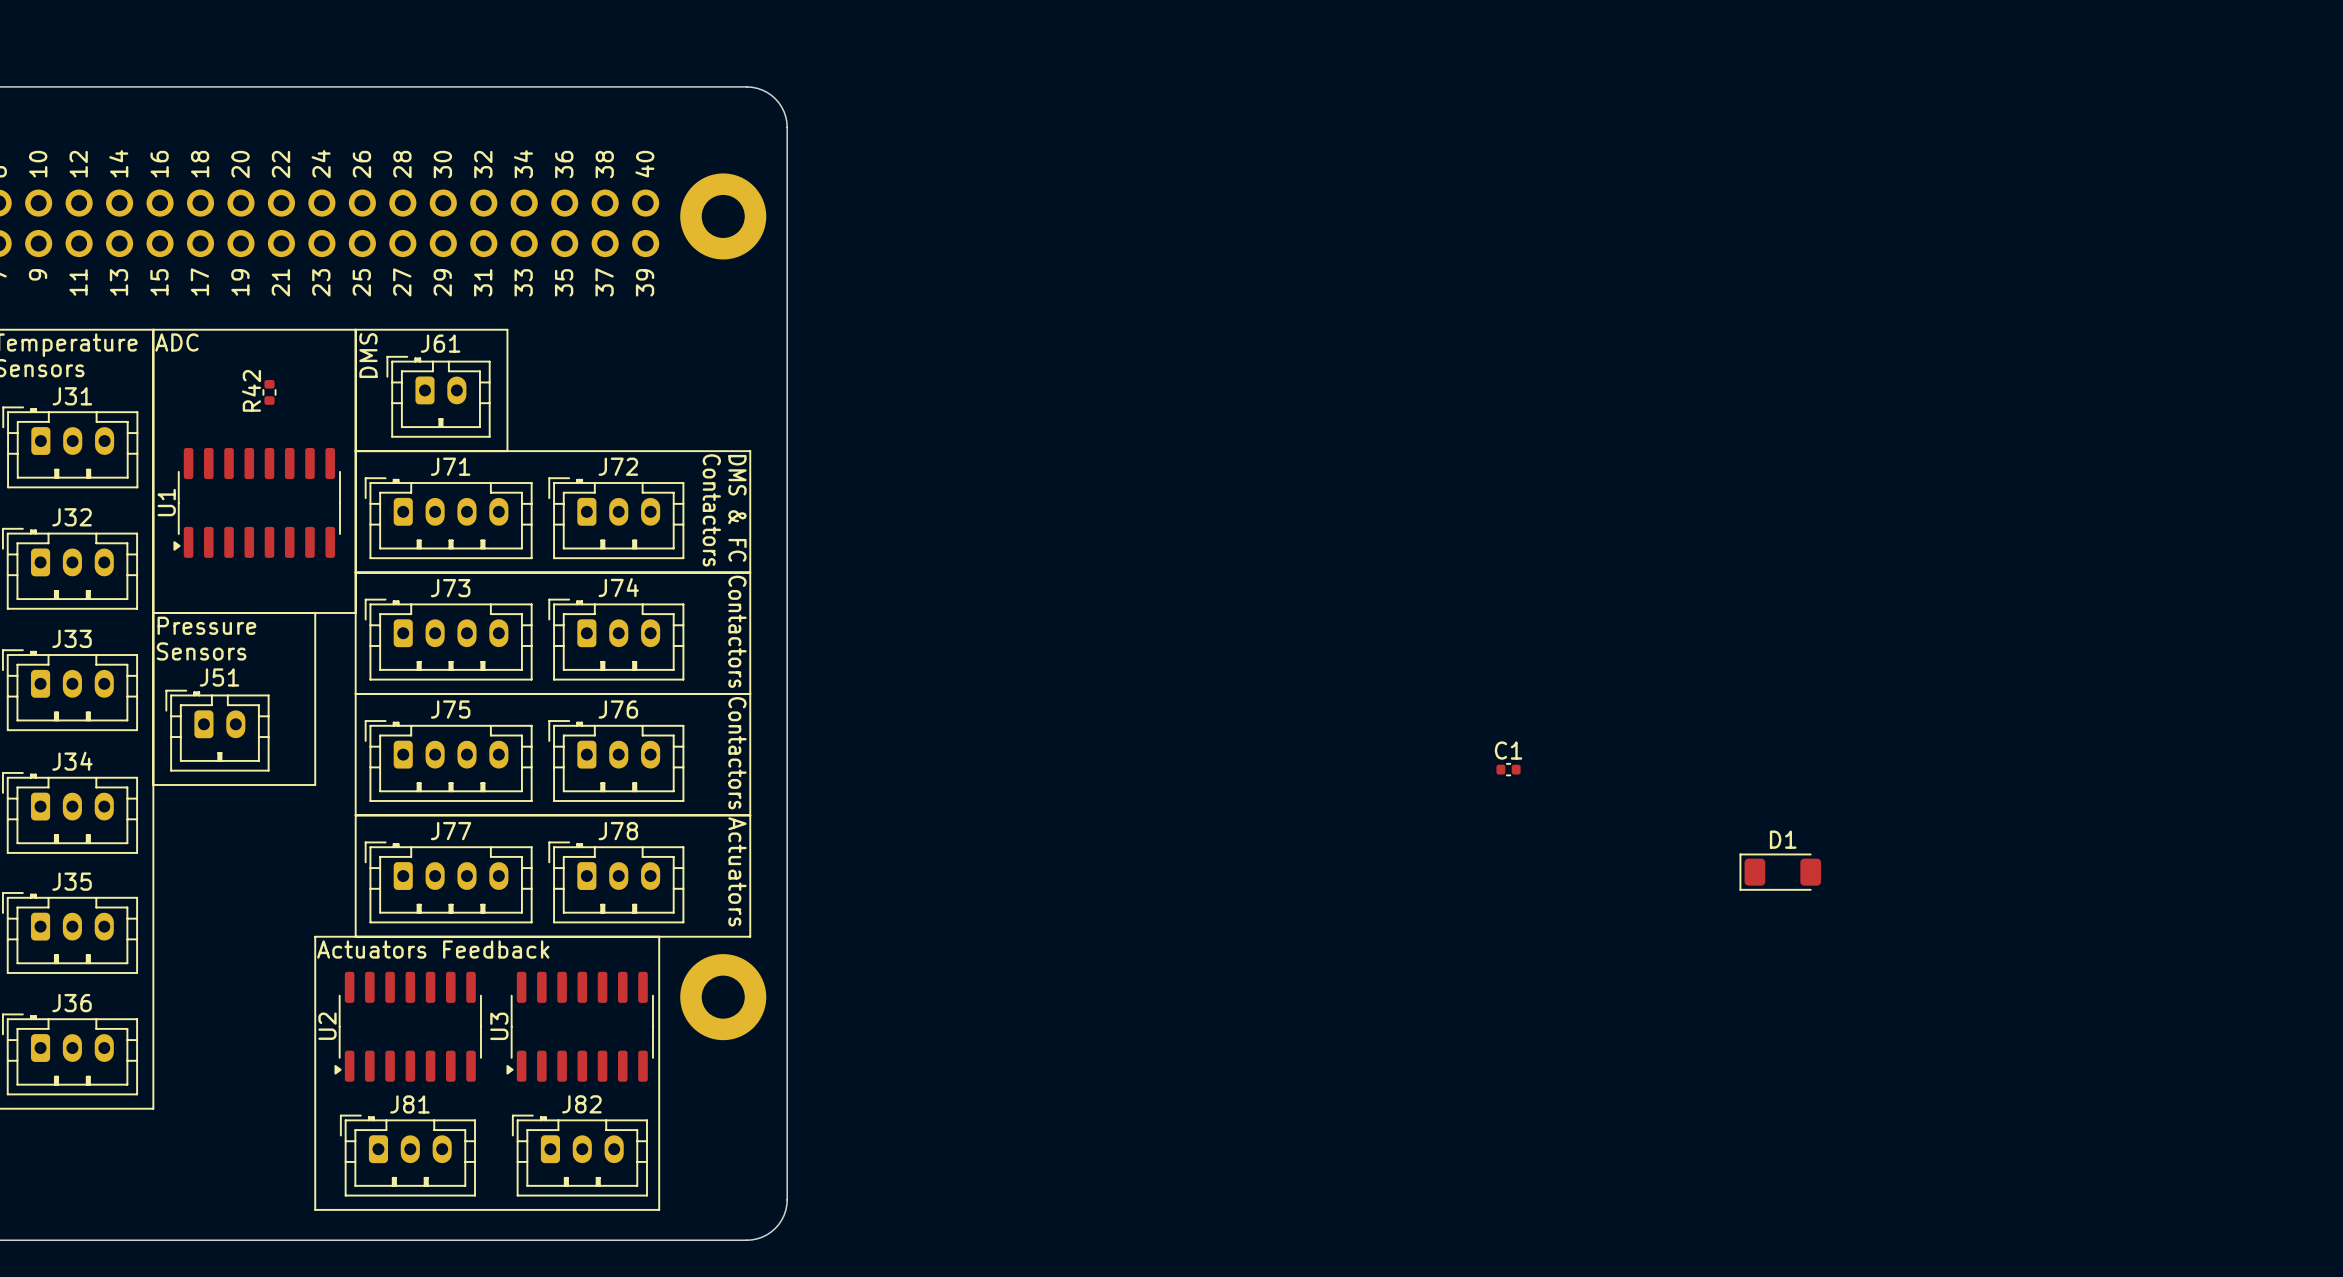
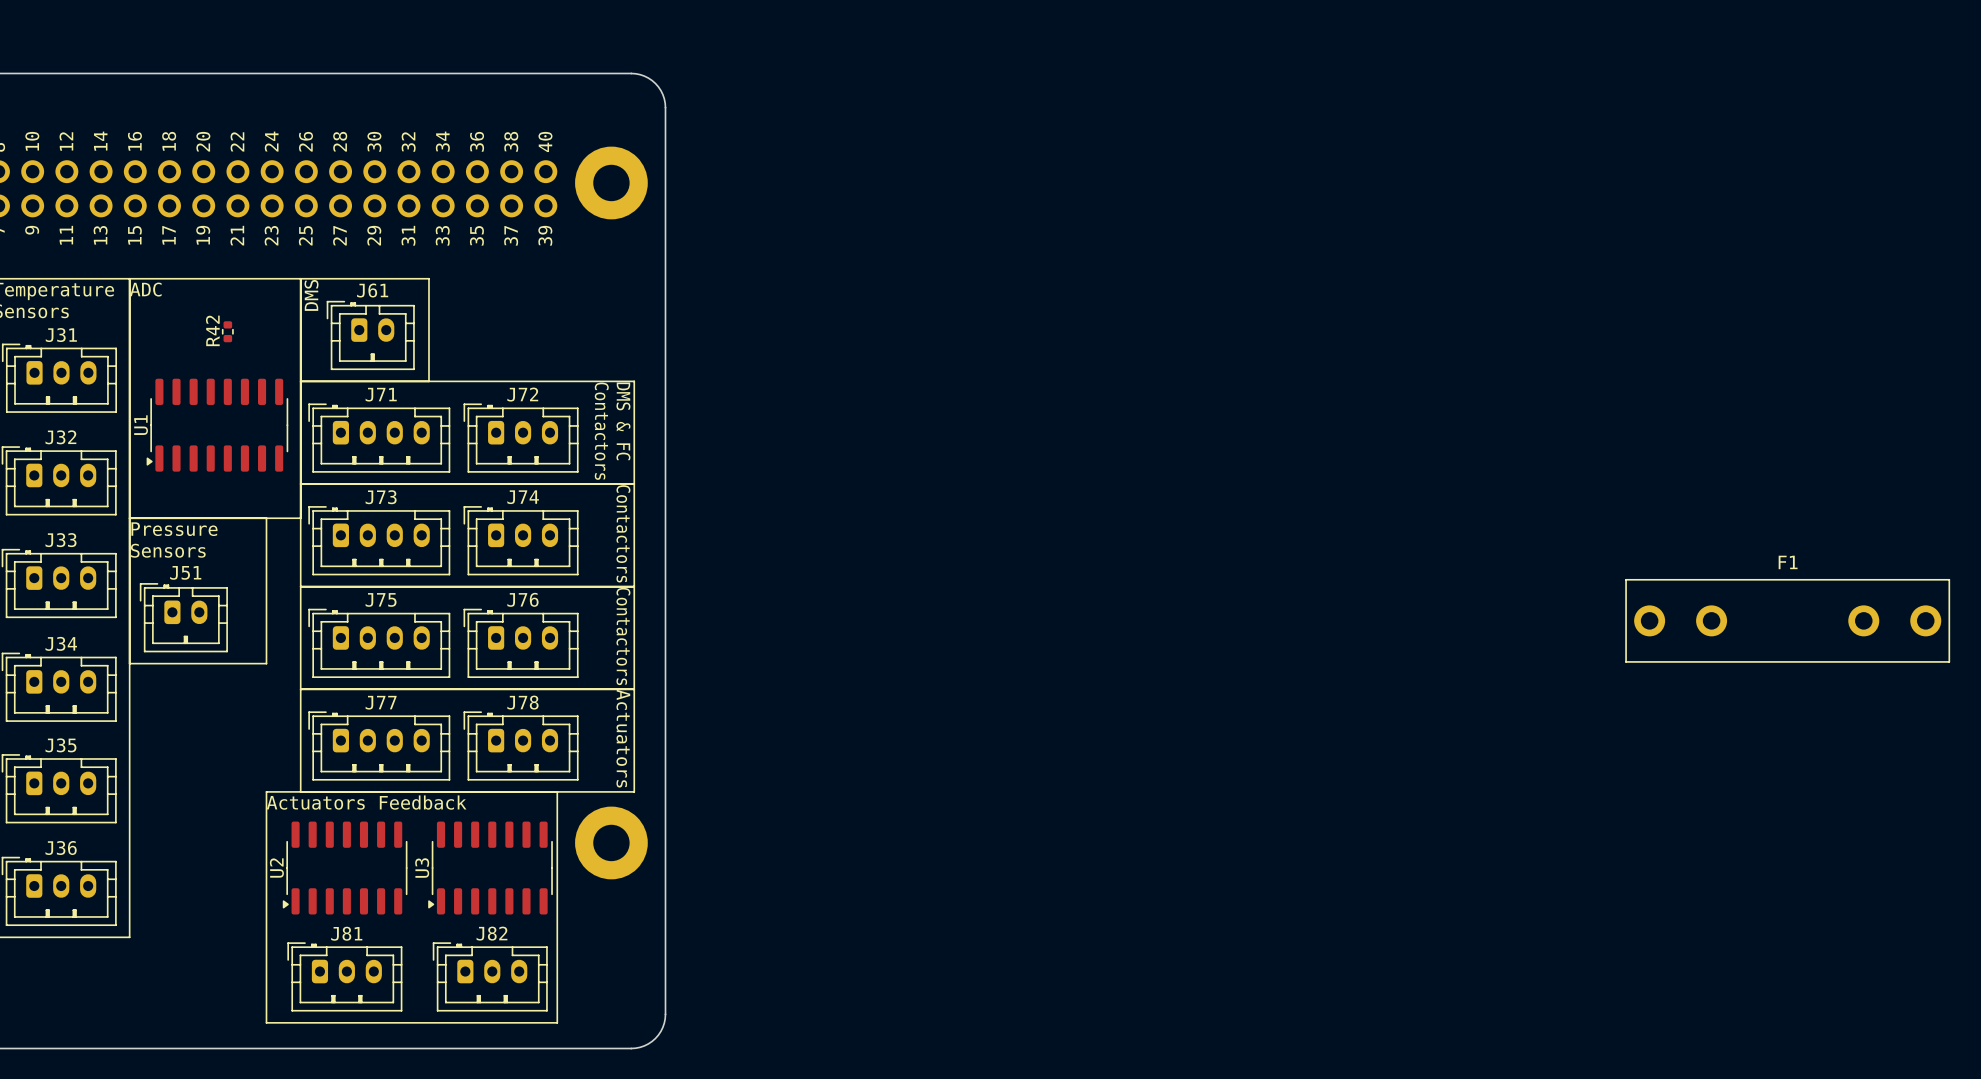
F1: none -> (1787, 620)
C1: (1508, 769) -> none
D1: (1780, 872) -> none

